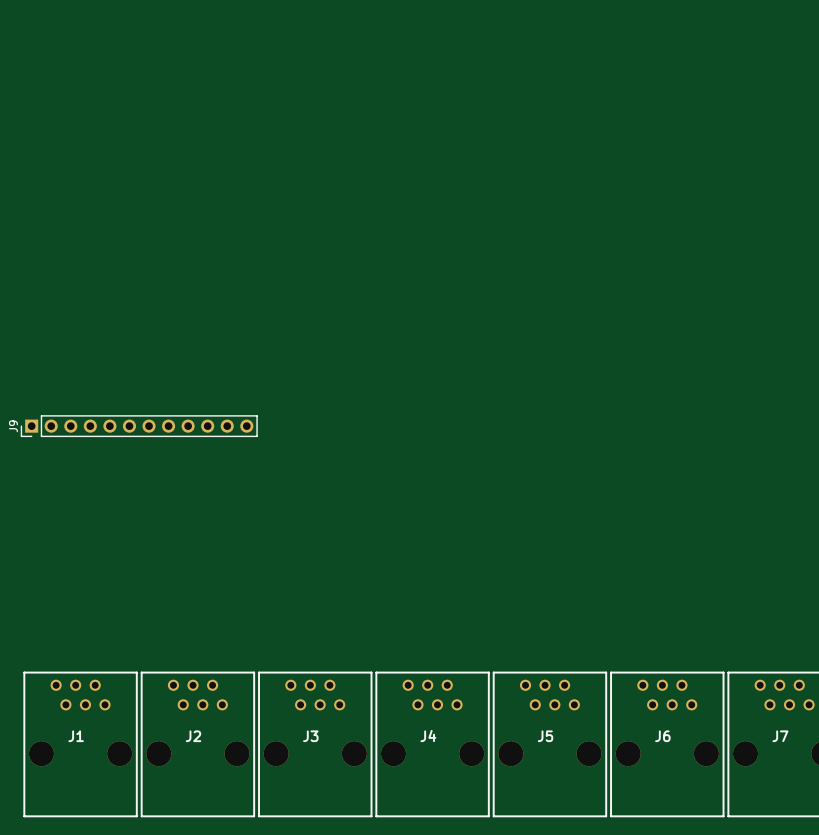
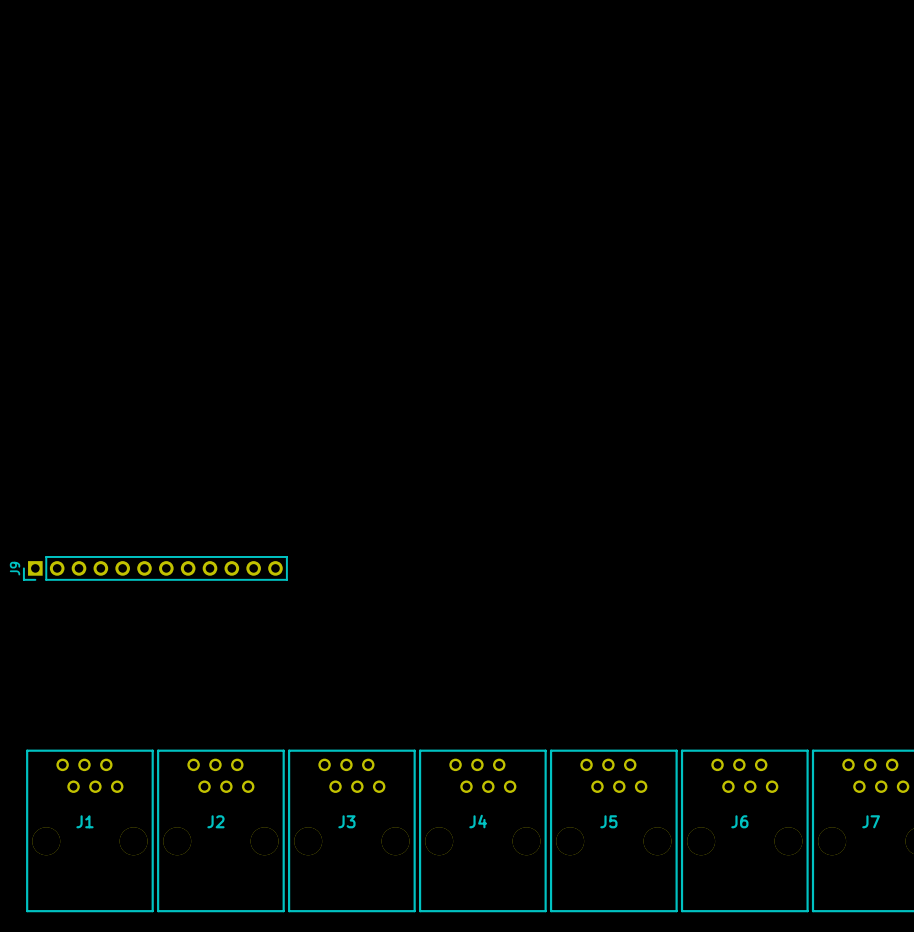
J9 position: (139, 426) -> (155, 568)

